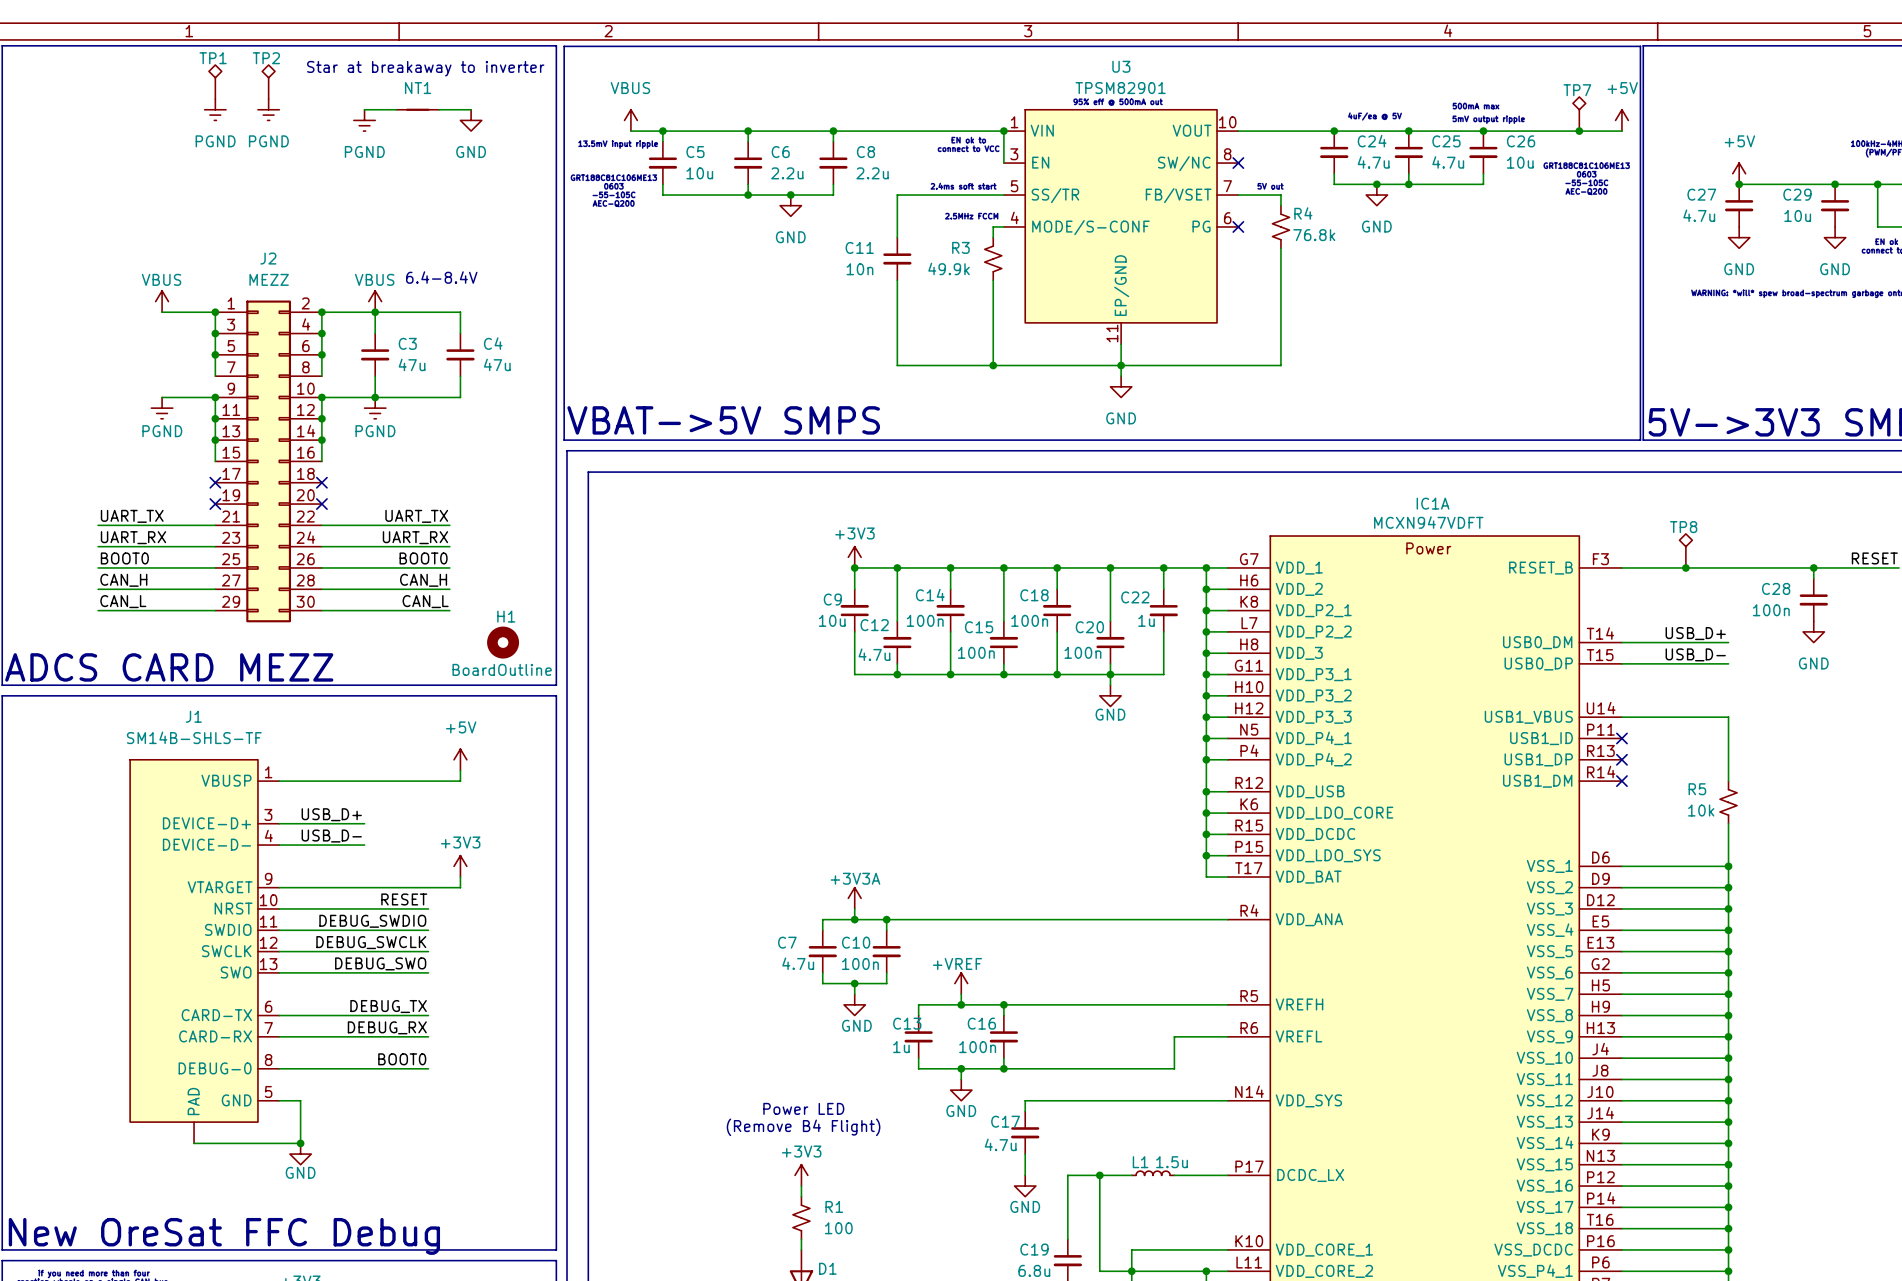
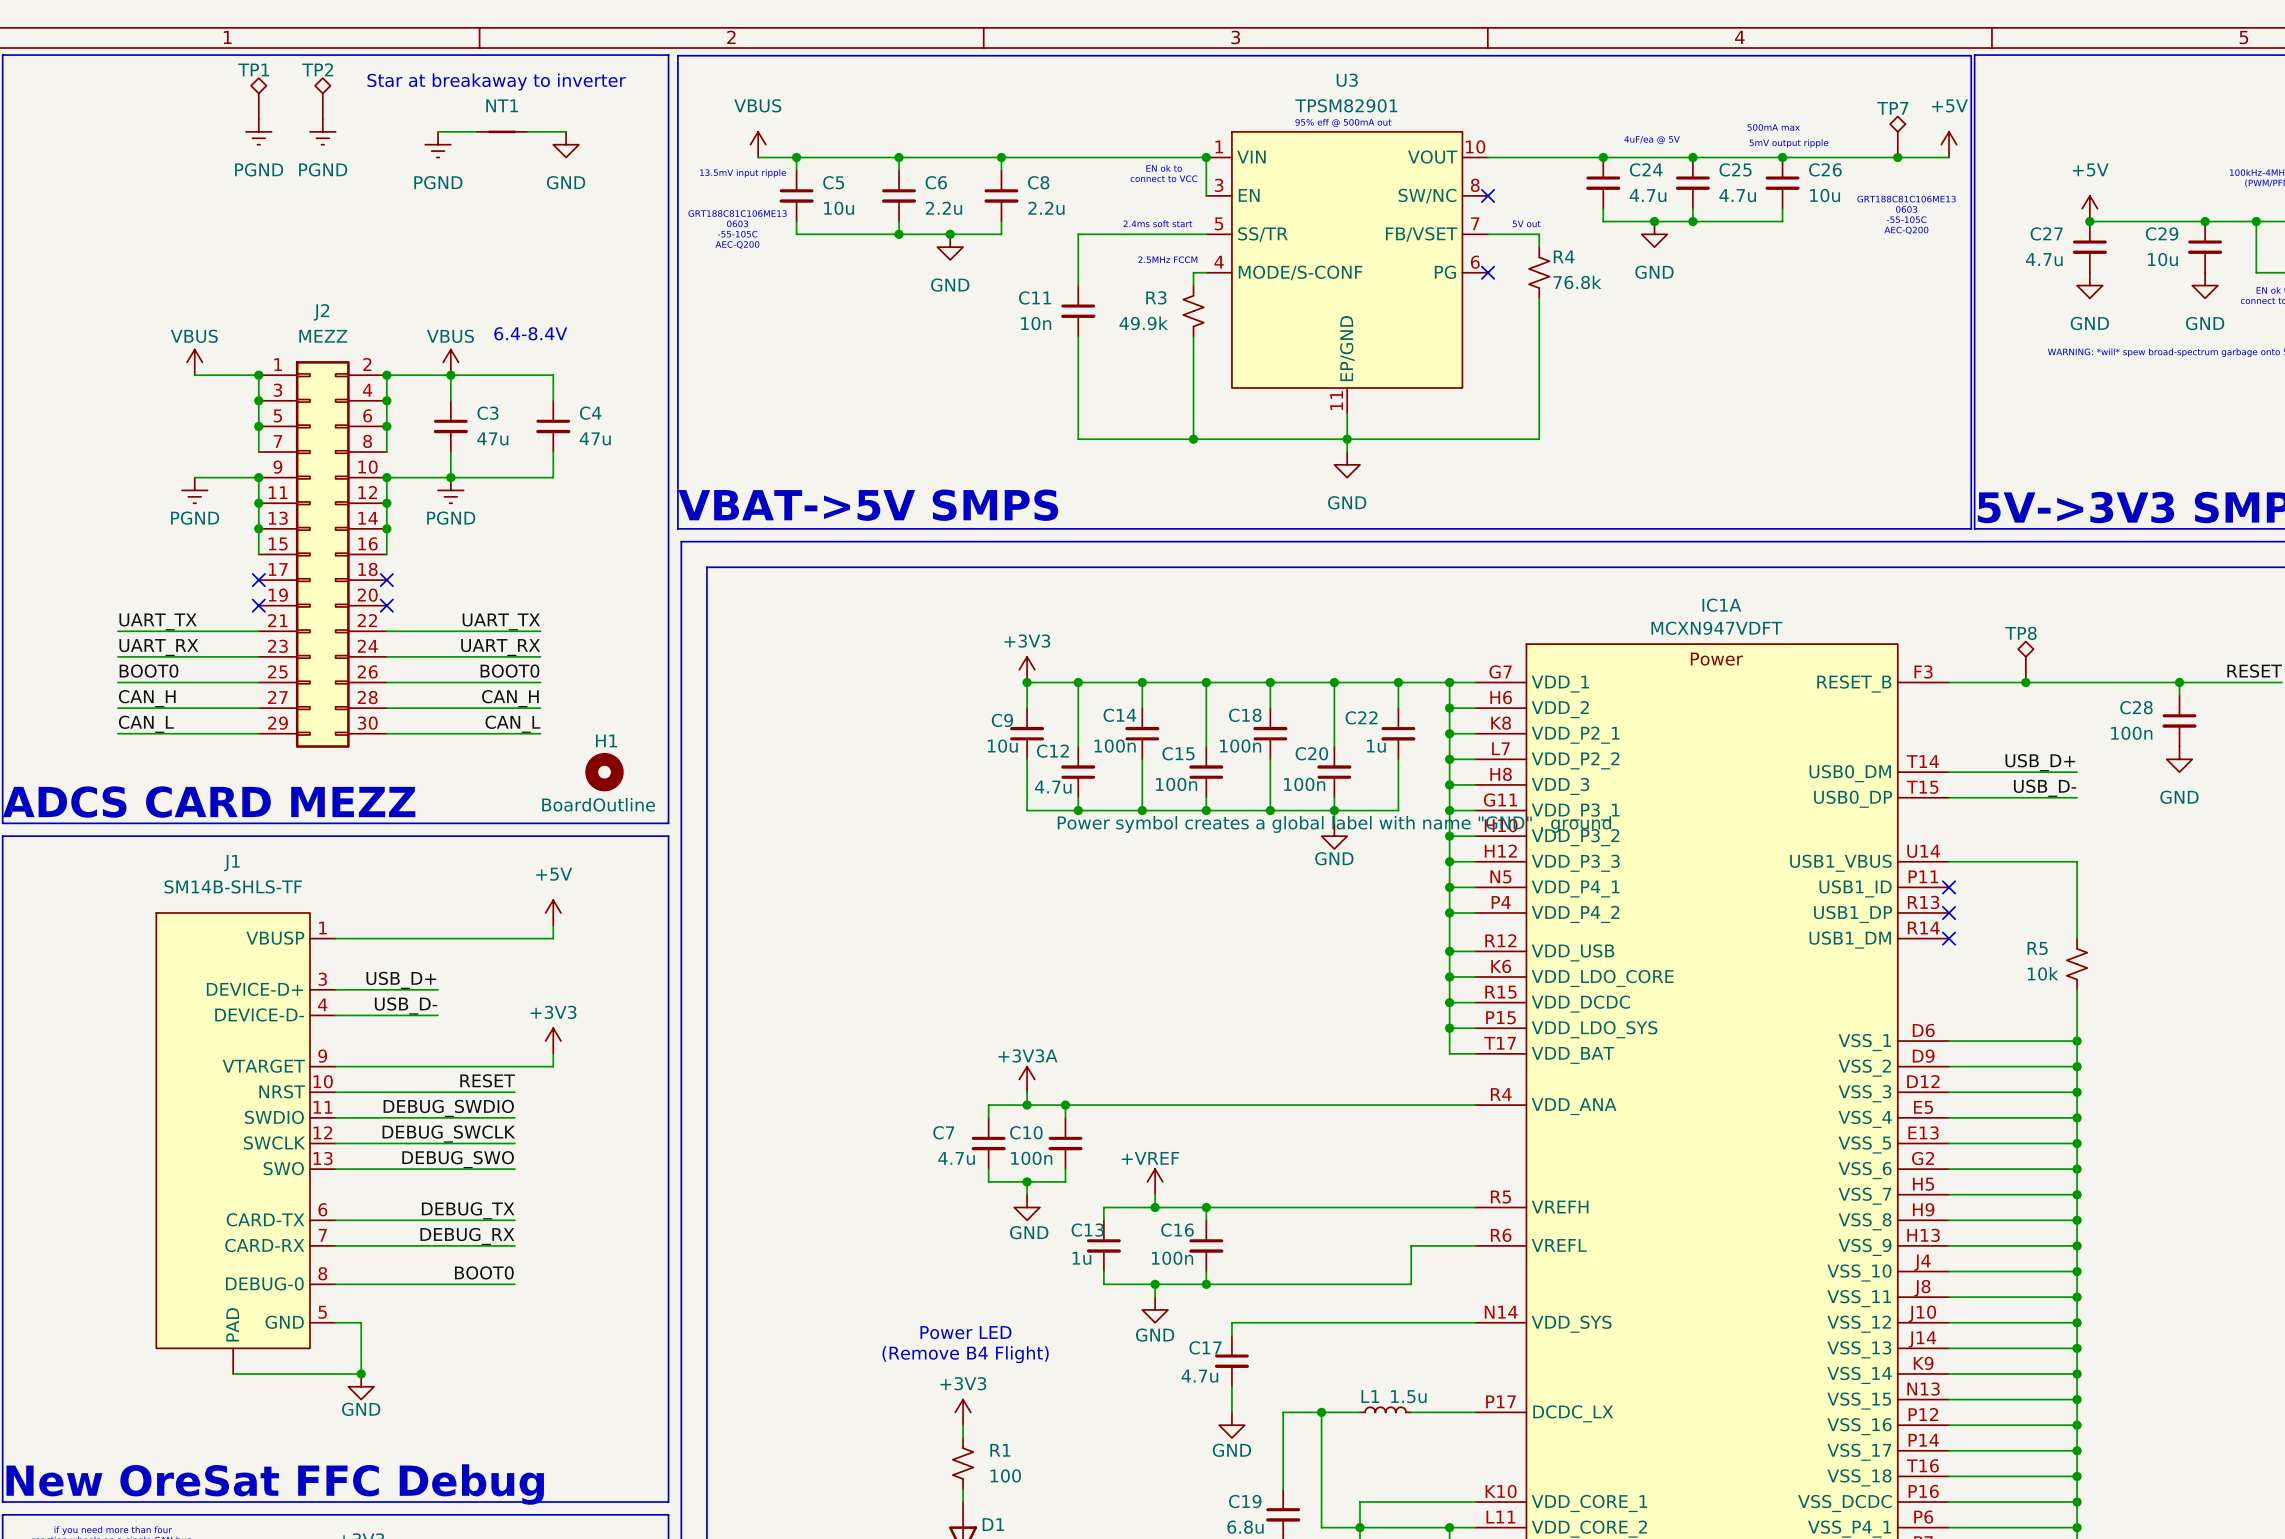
power symbol text: none -> Power symbol creates a global label with name "GND" , ground (1334, 824)

